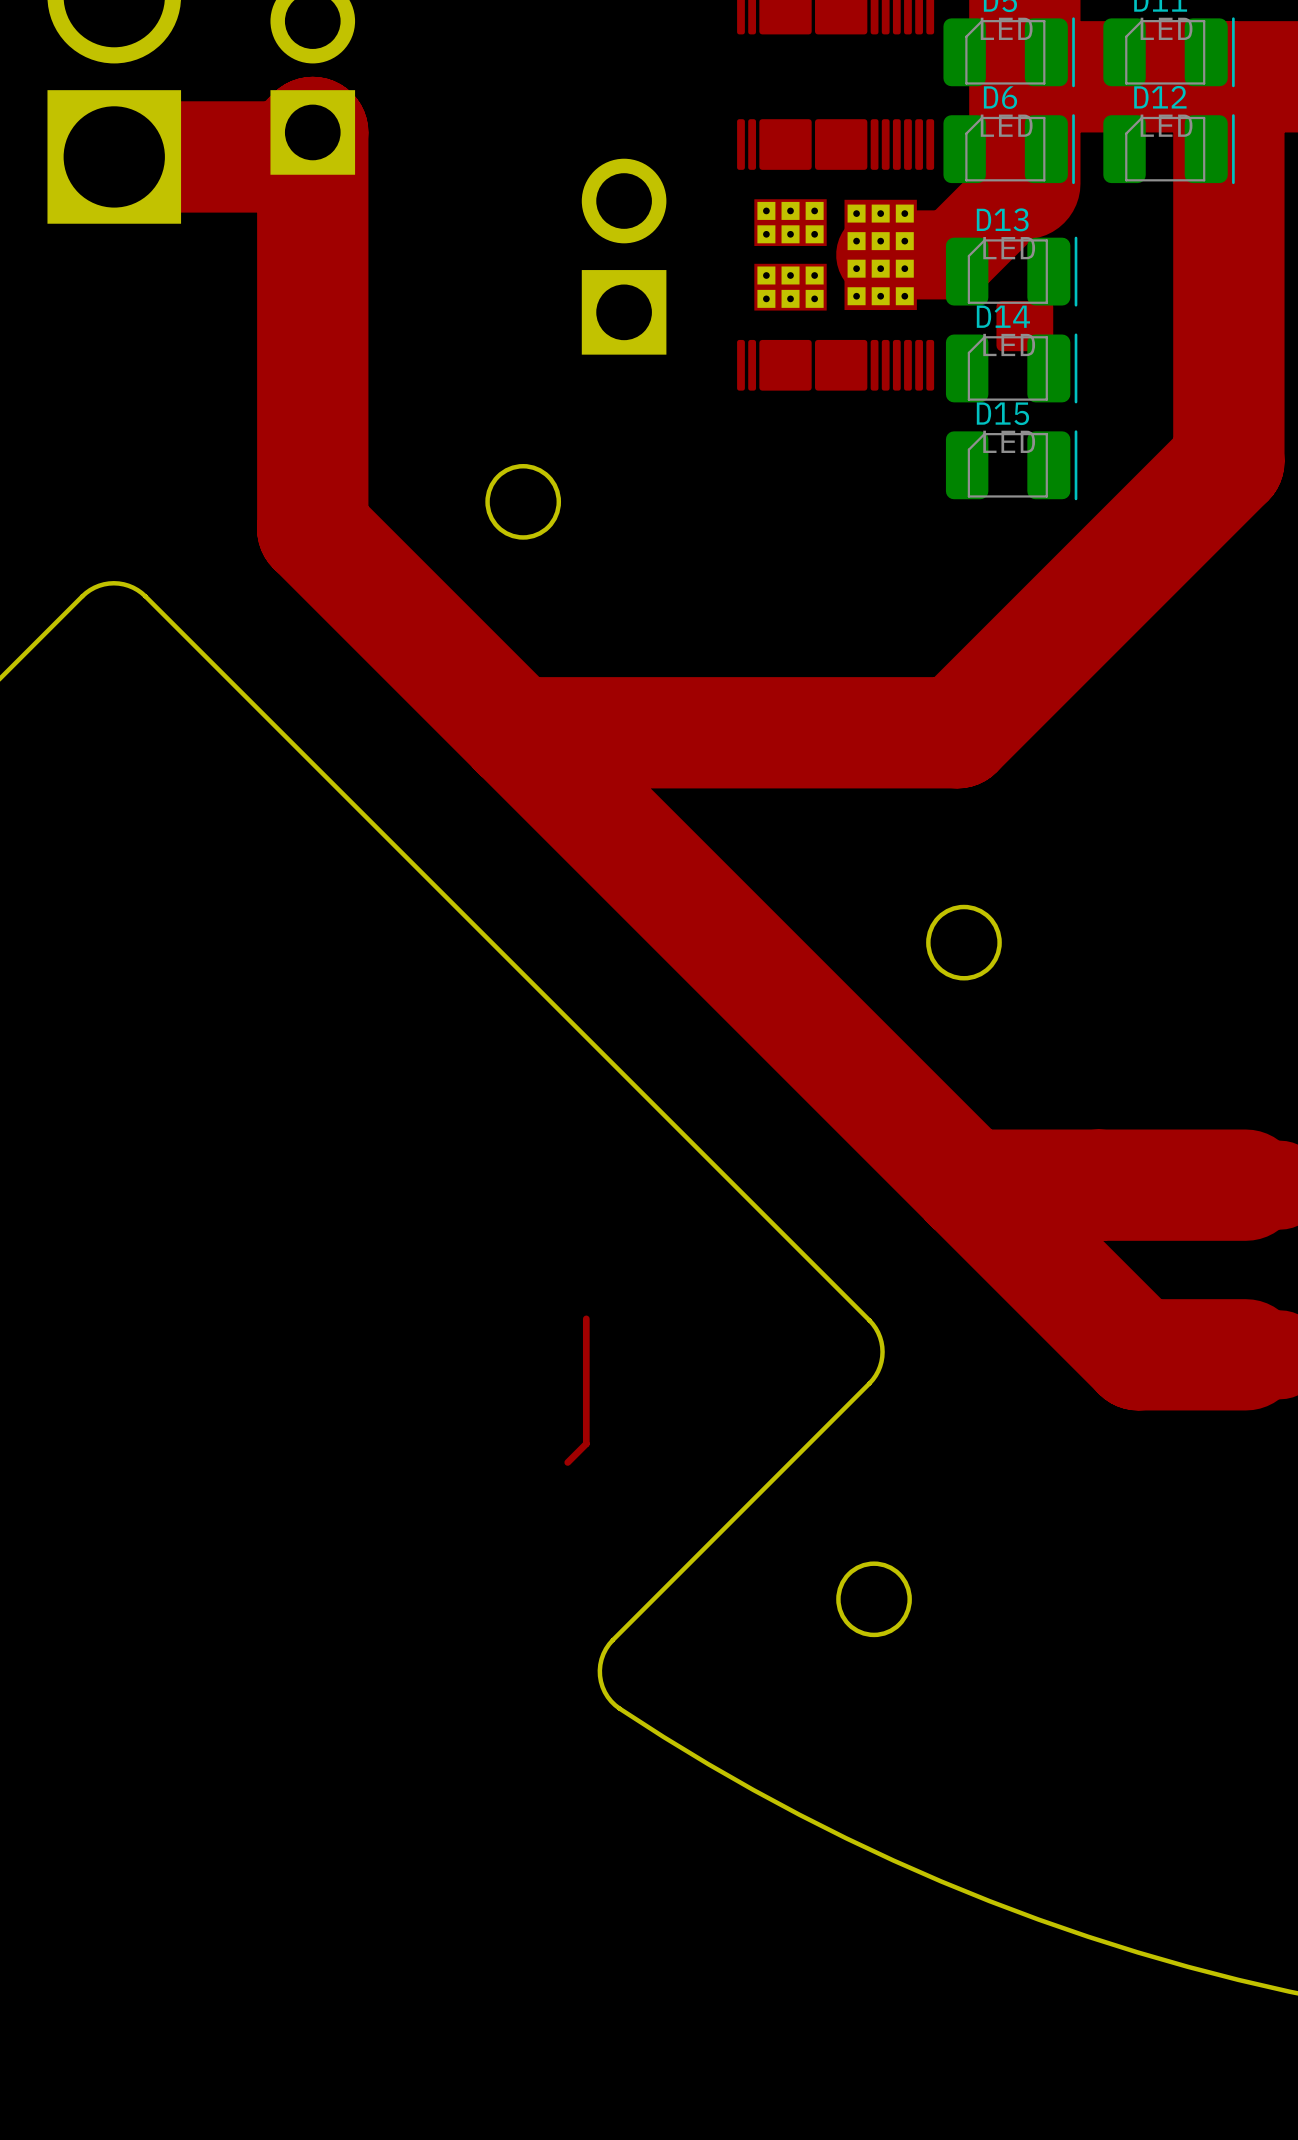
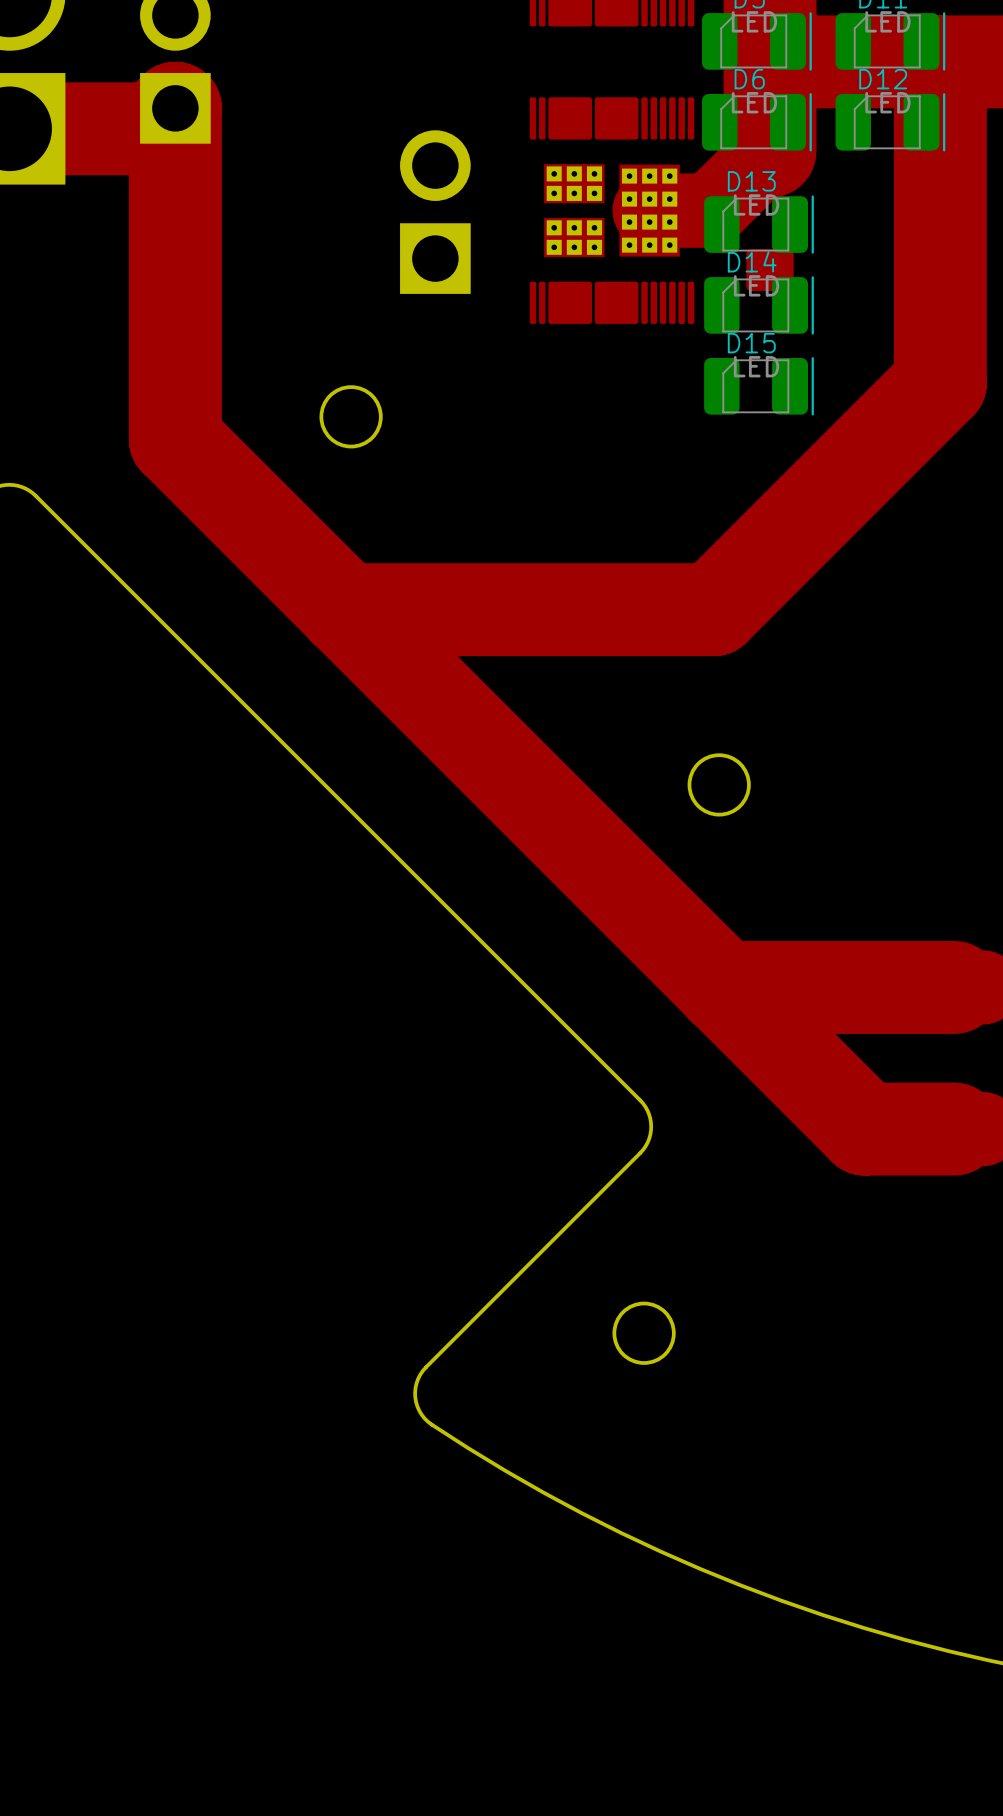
top track: (586, 1318) (586, 1443) (567, 1462) -> none

